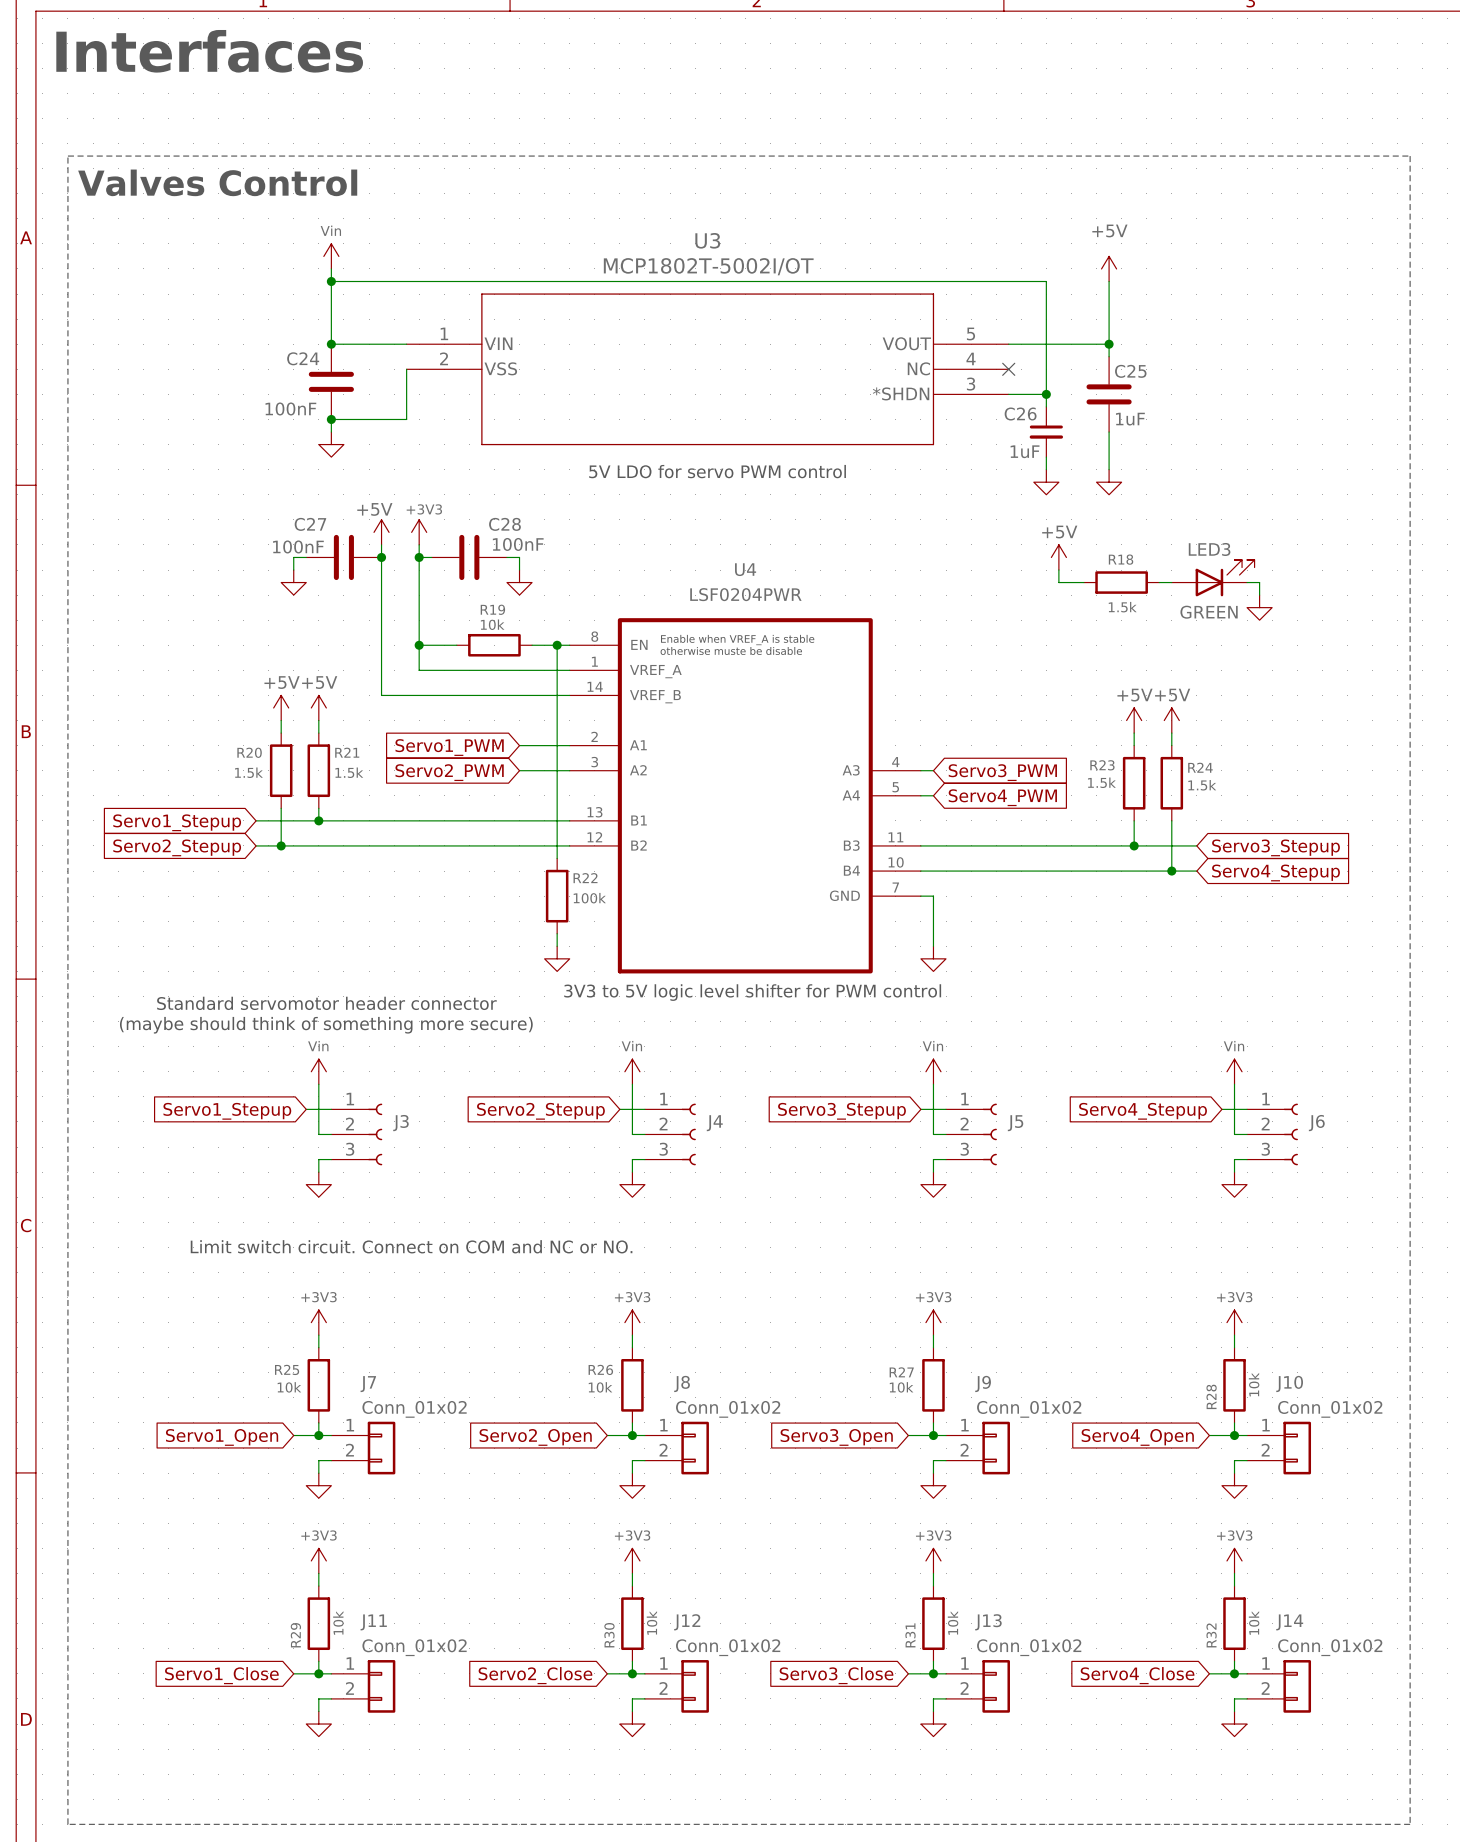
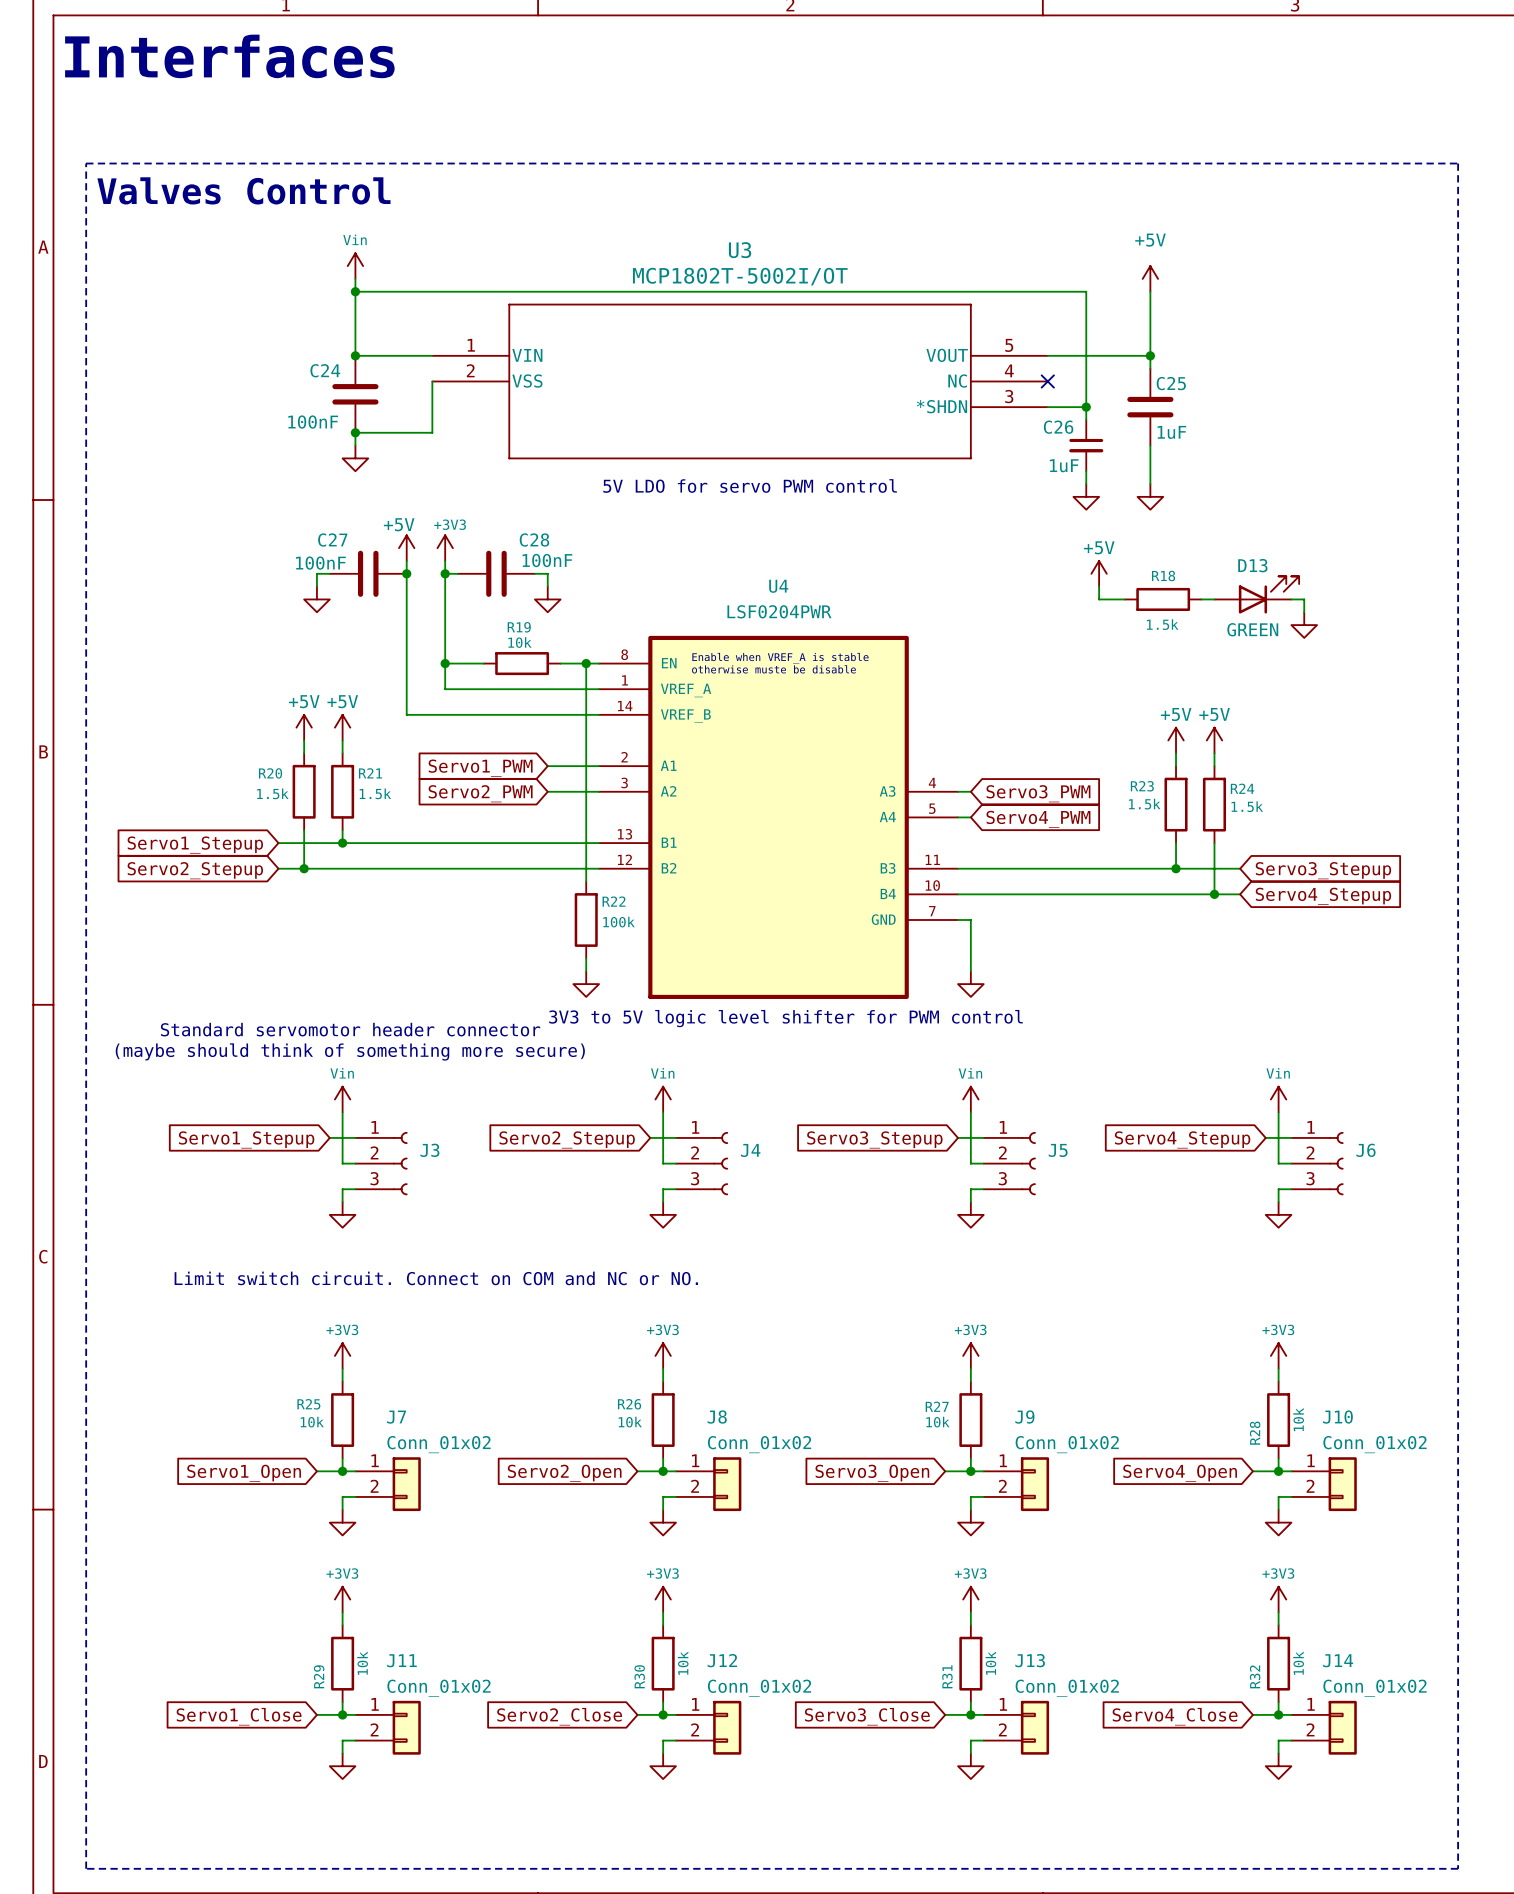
LED3 name: LED3 (1209, 549) -> D13 (1252, 565)

